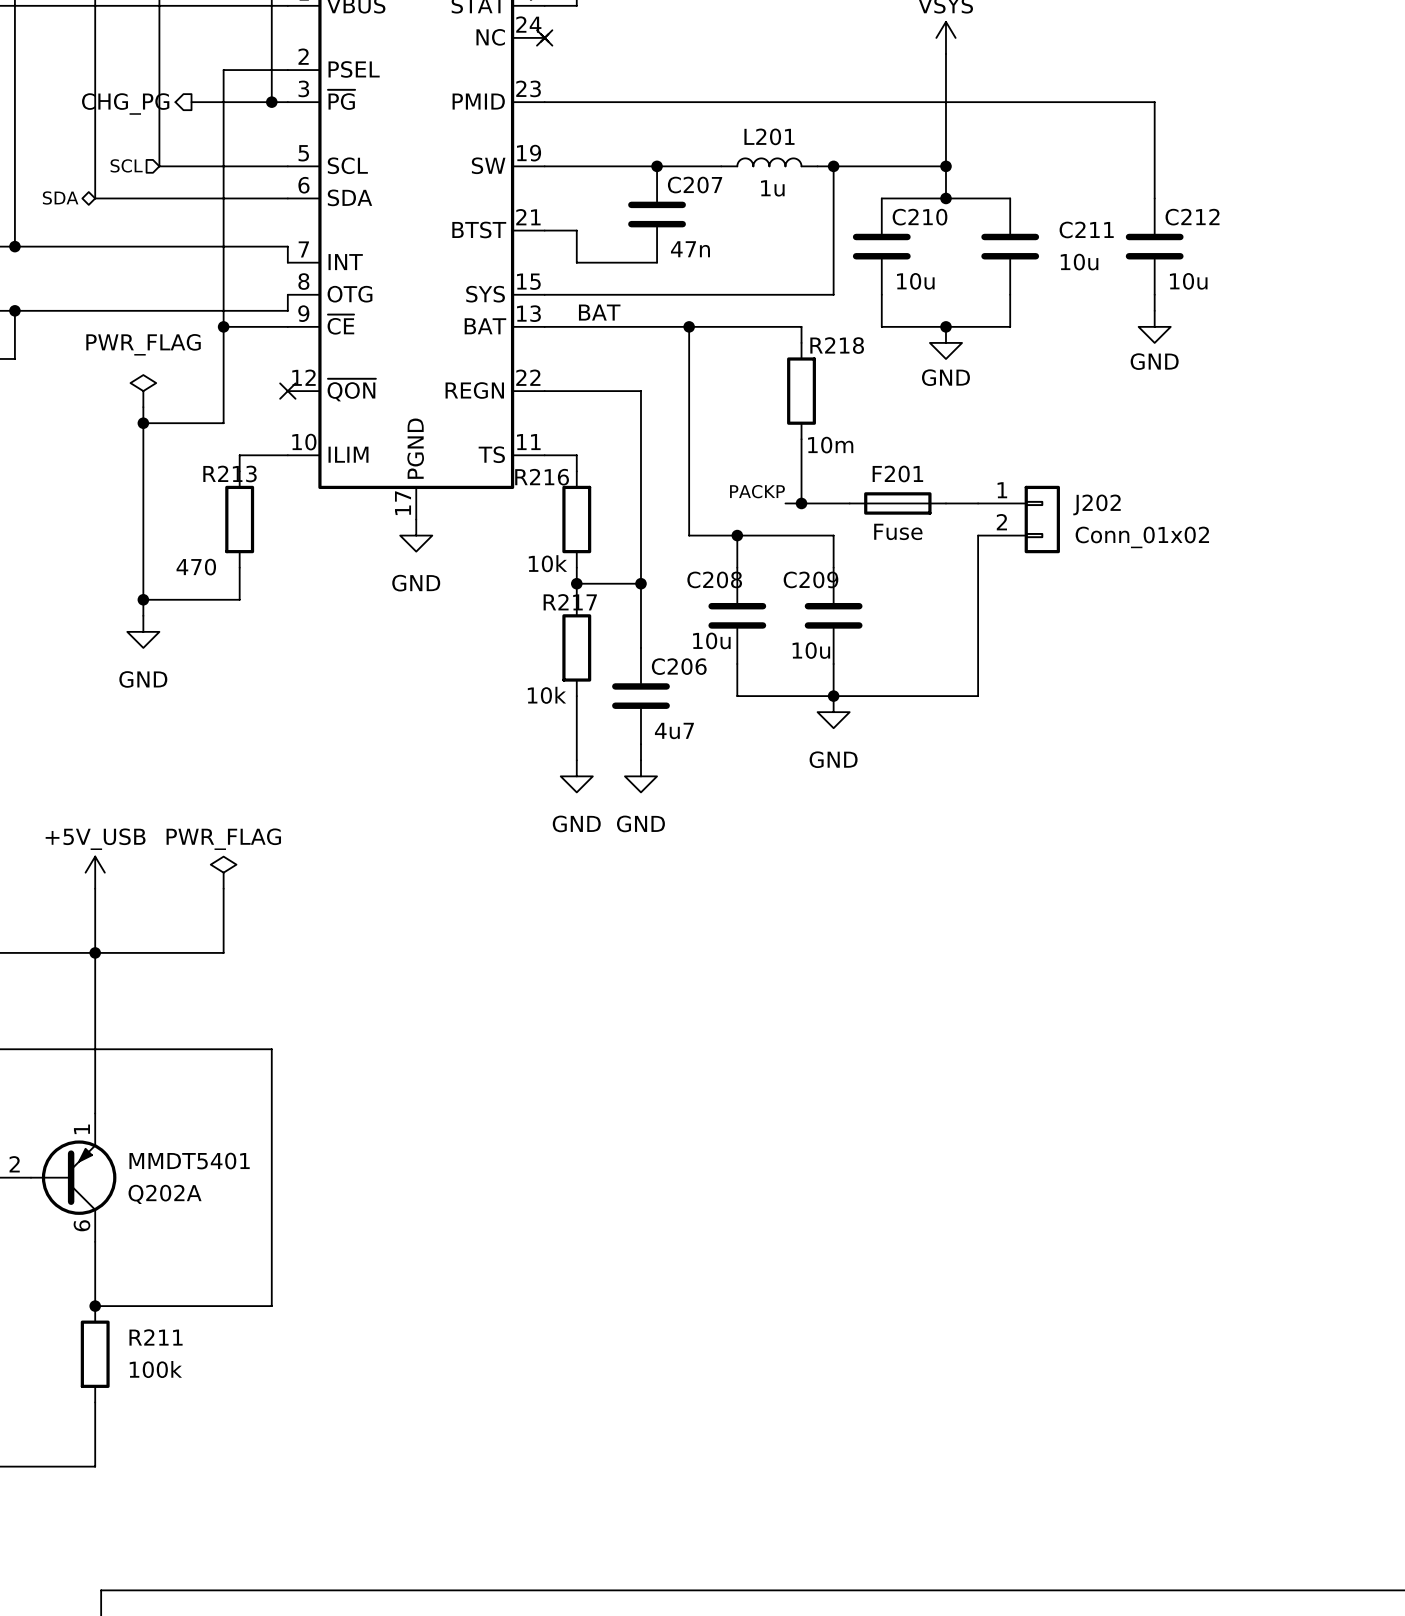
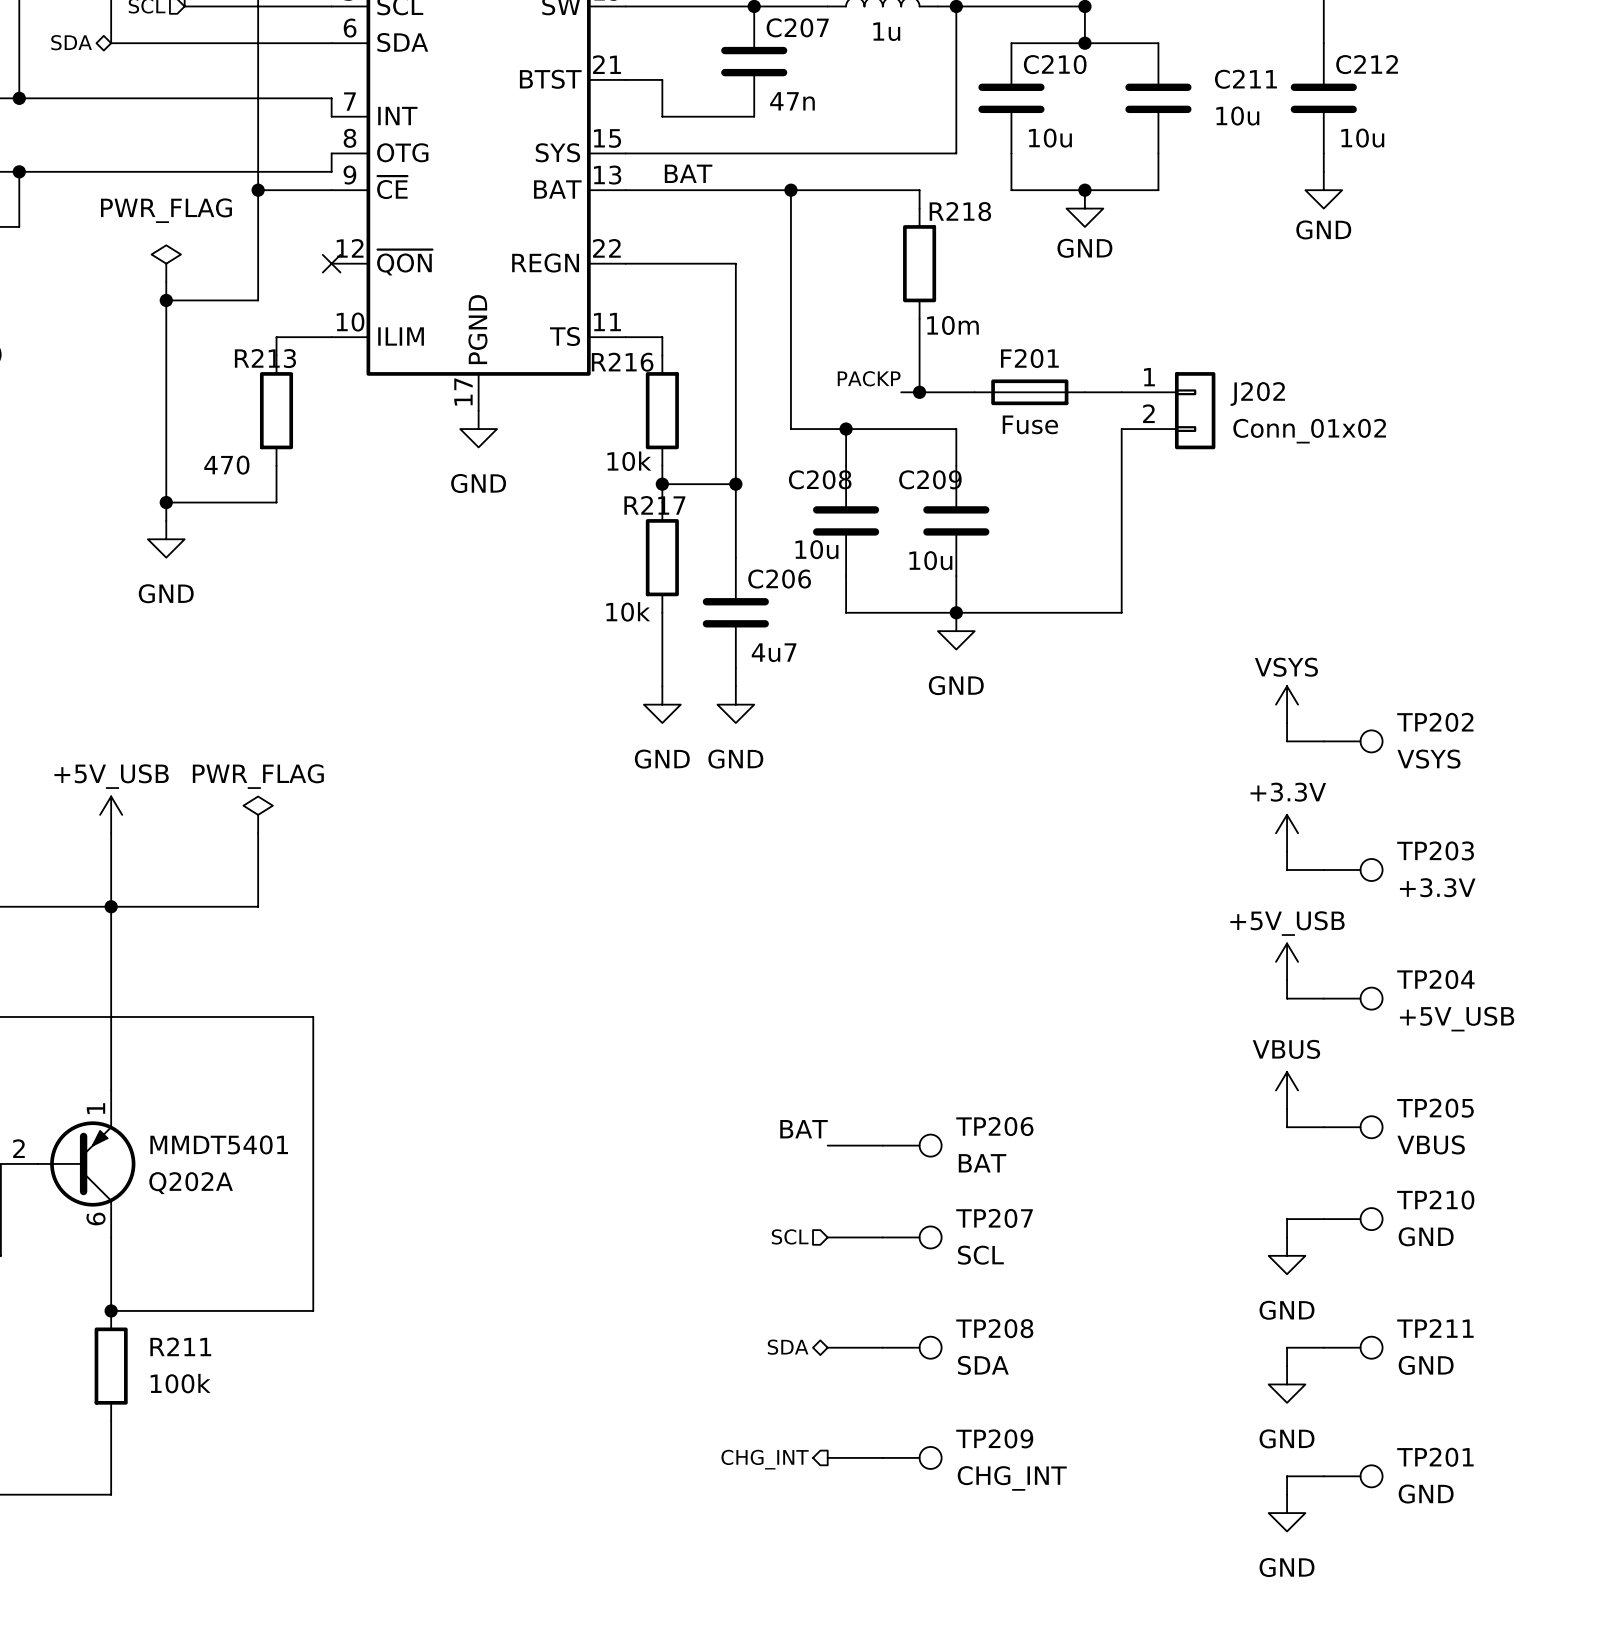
power symbol: none -> VSYS (1287, 704)
wire: none -> (1287, 723) (1287, 741) (1323, 741)
TP202: none -> VSYS (1353, 741)
power symbol: none -> +3.3V (1287, 833)
wire: none -> (1287, 851) (1287, 870) (1323, 870)
TP203: none -> +3.3V (1353, 870)
power symbol: none -> +5V_USB (1287, 961)
wire: none -> (1287, 980) (1287, 998) (1323, 998)
TP204: none -> +5V_USB (1353, 998)
power symbol: none -> VBUS (1287, 1090)
wire: none -> (1287, 1108) (1287, 1127) (1323, 1127)
TP205: none -> VBUS (1353, 1127)
label: none -> BAT (804, 1129)
wire: none -> (827, 1145) (882, 1145)
TP206: none -> BAT (912, 1145)
wire: none -> (1323, 1219) (1287, 1219) (1287, 1237)
TP210: none -> GND (1353, 1219)
hierarchical label: none -> SCL (790, 1236)
wire: none -> (827, 1237) (882, 1237)
TP207: none -> SCL (912, 1237)
power symbol: none -> GND (1287, 1255)
hierarchical label: none -> SDA (788, 1347)
wire: none -> (827, 1347) (882, 1347)
TP208: none -> SDA (912, 1347)
wire: none -> (1323, 1347) (1287, 1347) (1287, 1366)
TP211: none -> GND (1353, 1347)
power symbol: none -> GND (1287, 1384)
wire: none -> (827, 1457) (882, 1457)
TP209: none -> CHG_INT (912, 1457)
hierarchical label: none -> CHG_INT (765, 1459)
wire: none -> (1323, 1476) (1287, 1476) (1287, 1494)
TP201: none -> GND (1353, 1476)
power symbol: none -> GND (1287, 1513)

